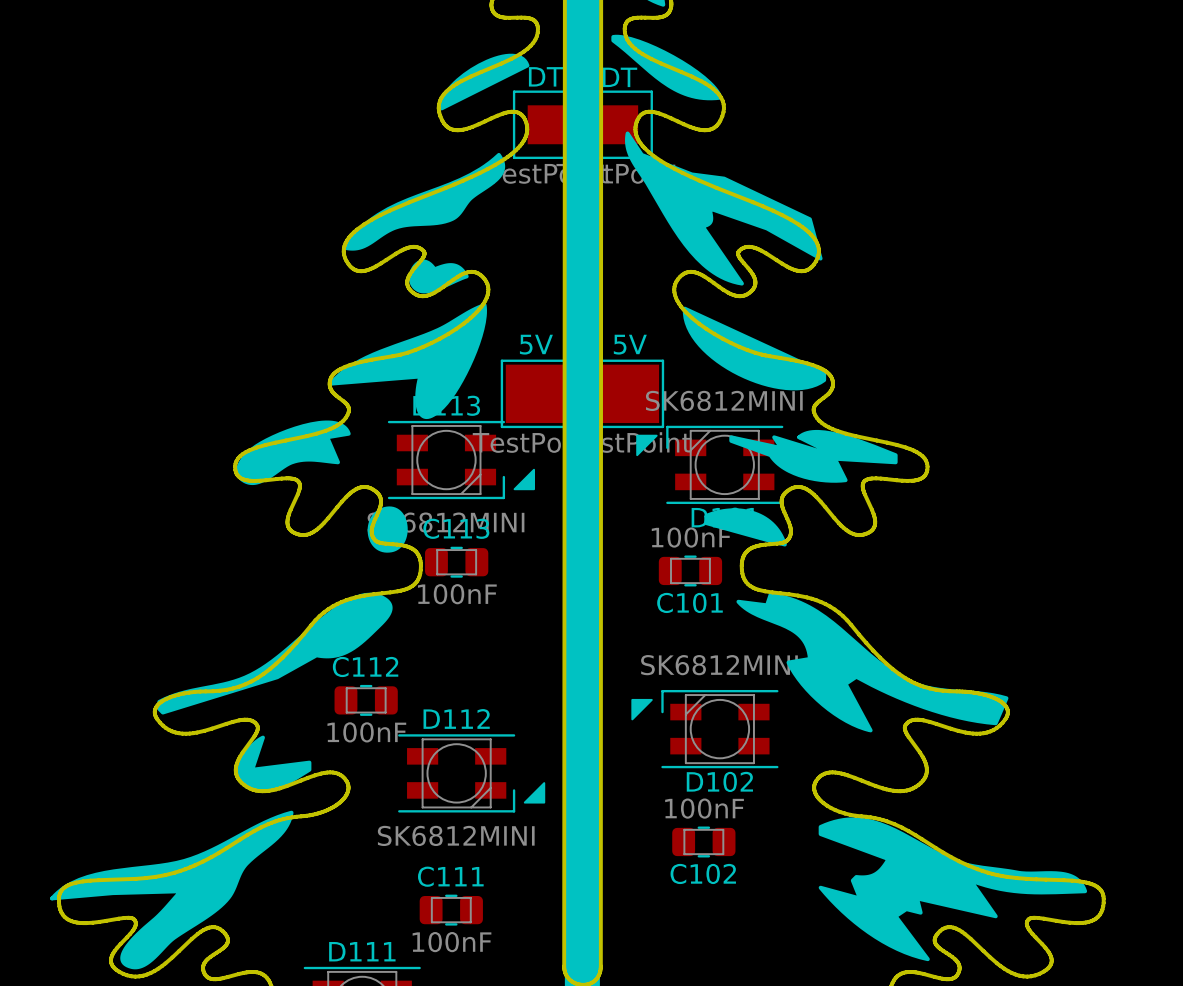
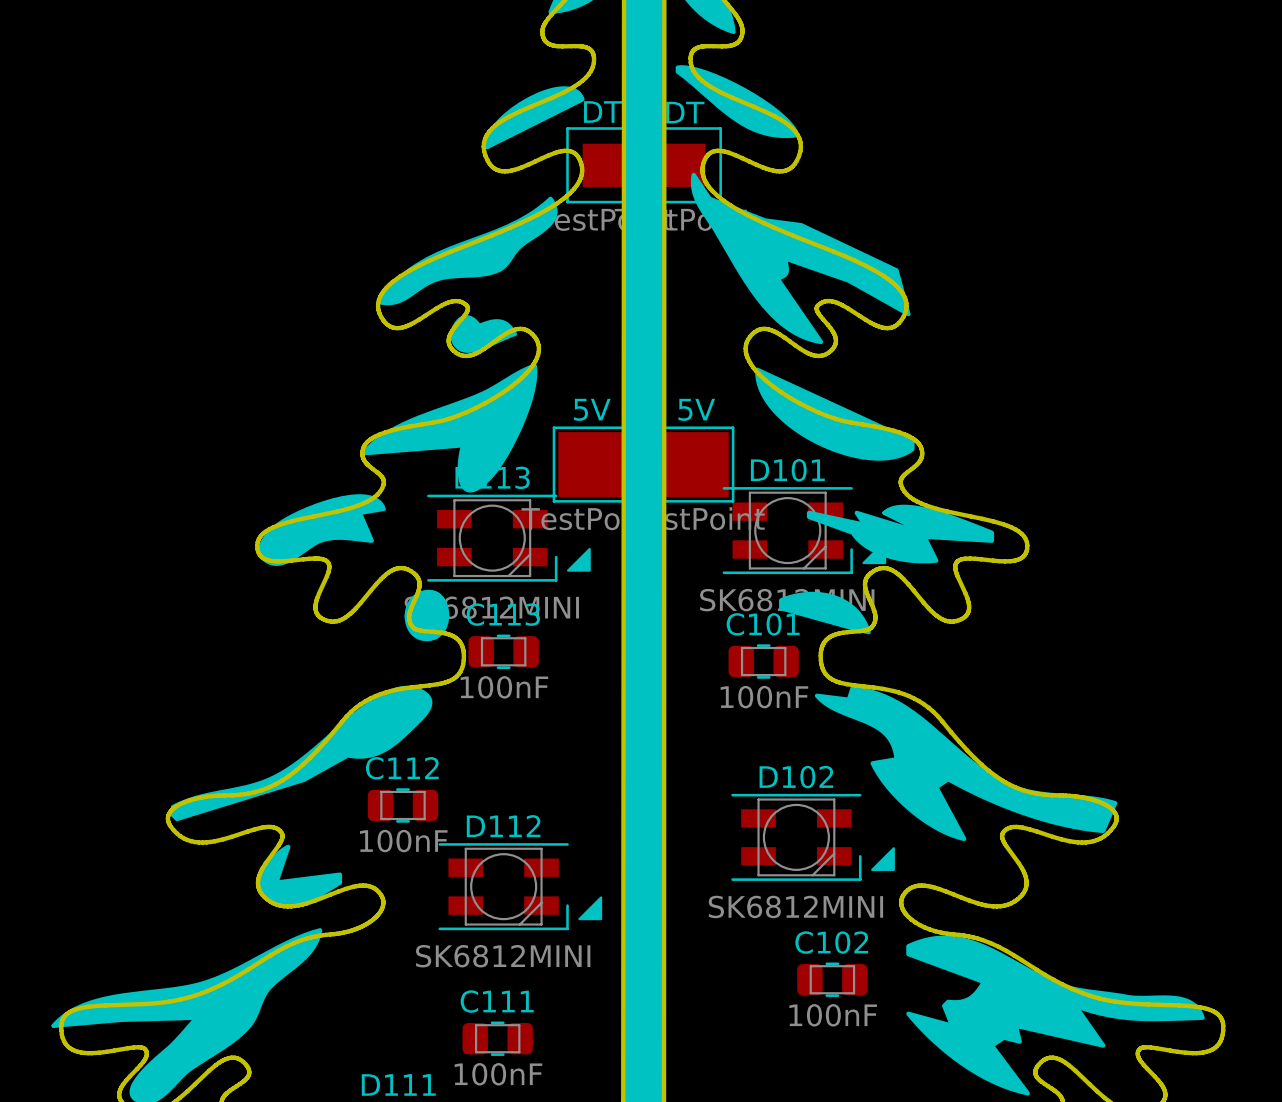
D101 rotation: 0° (709, 464) -> 180° (804, 530)
C101 value position: 100nF (691, 537) -> 100nF (764, 697)
C101 name position: C101 (689, 602) -> C101 (763, 624)
D102 rotation: 0° (704, 729) -> 180° (813, 837)
C102 value position: 100nF (704, 808) -> 100nF (833, 1015)
C102 position: (703, 841) -> (832, 979)
C102 name position: C102 (703, 873) -> C102 (831, 942)

